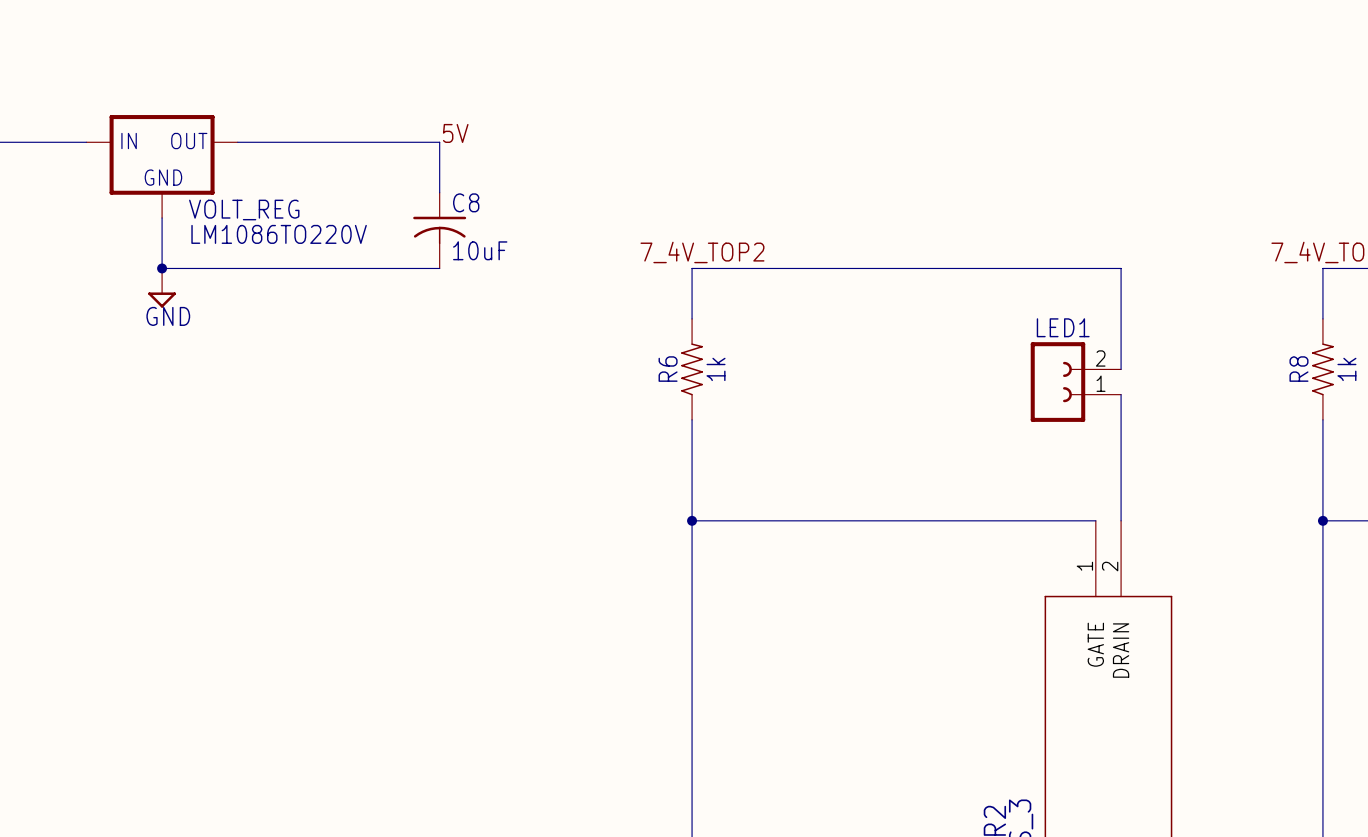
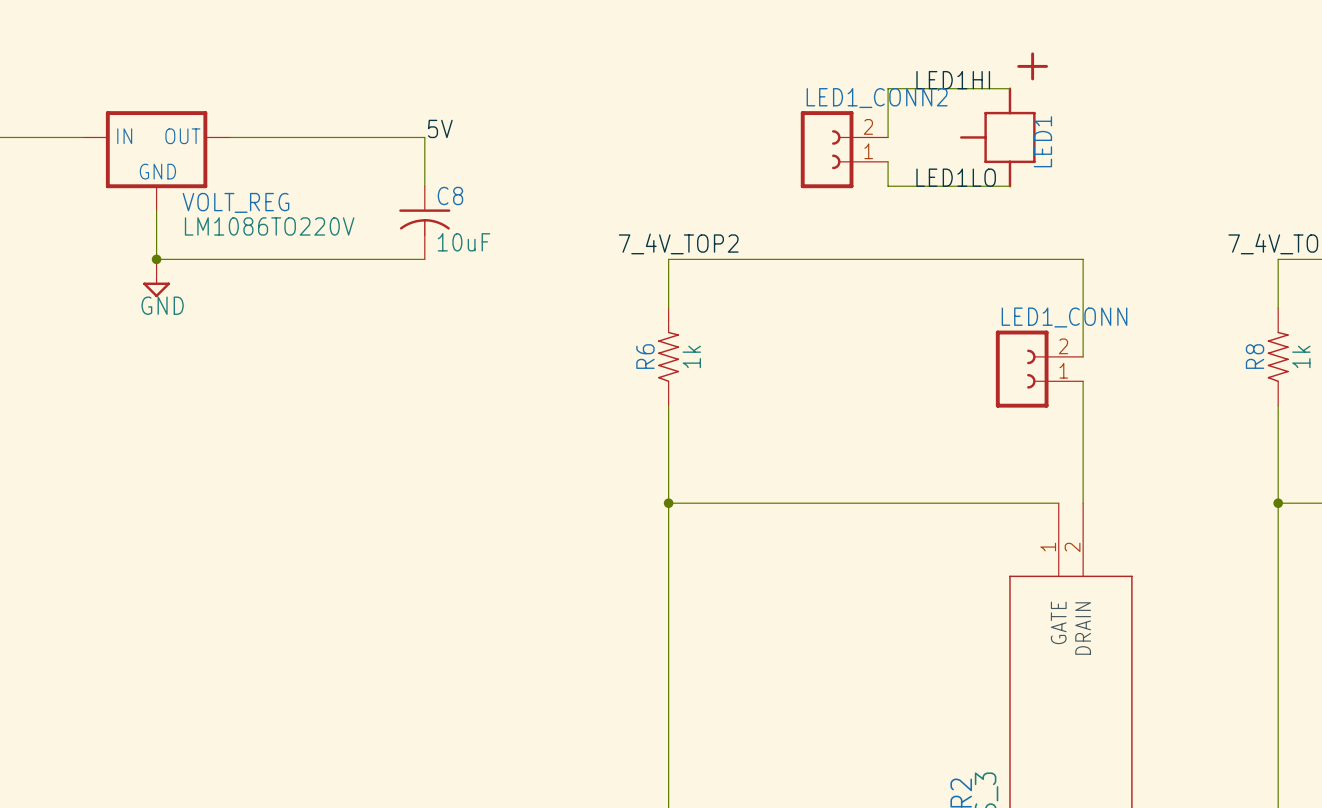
label: none -> LED1HI (953, 80)
wire: none -> (1009, 88) (888, 88) (888, 137)
LED1: none -> (997, 137)
LED1_CONN2: none -> (844, 149)
wire: none -> (888, 161) (888, 186) (1009, 186)
label: none -> LED1LO (956, 177)
LED1 name: LED1 (1063, 327) -> LED1_CONN (1064, 317)

